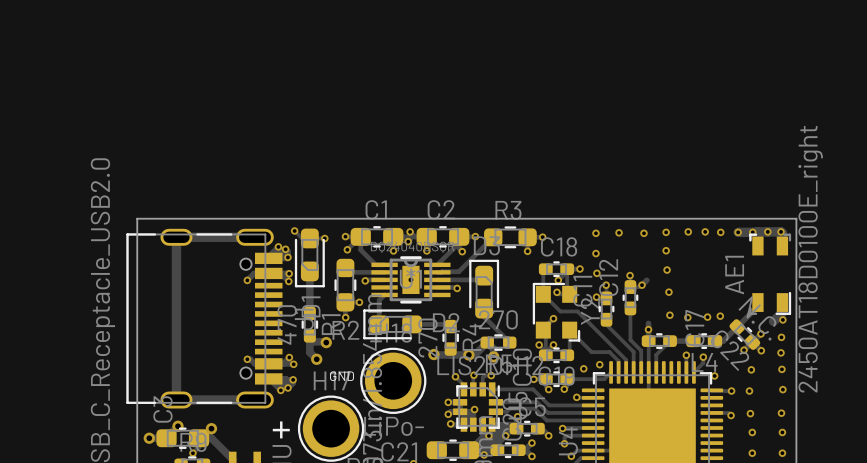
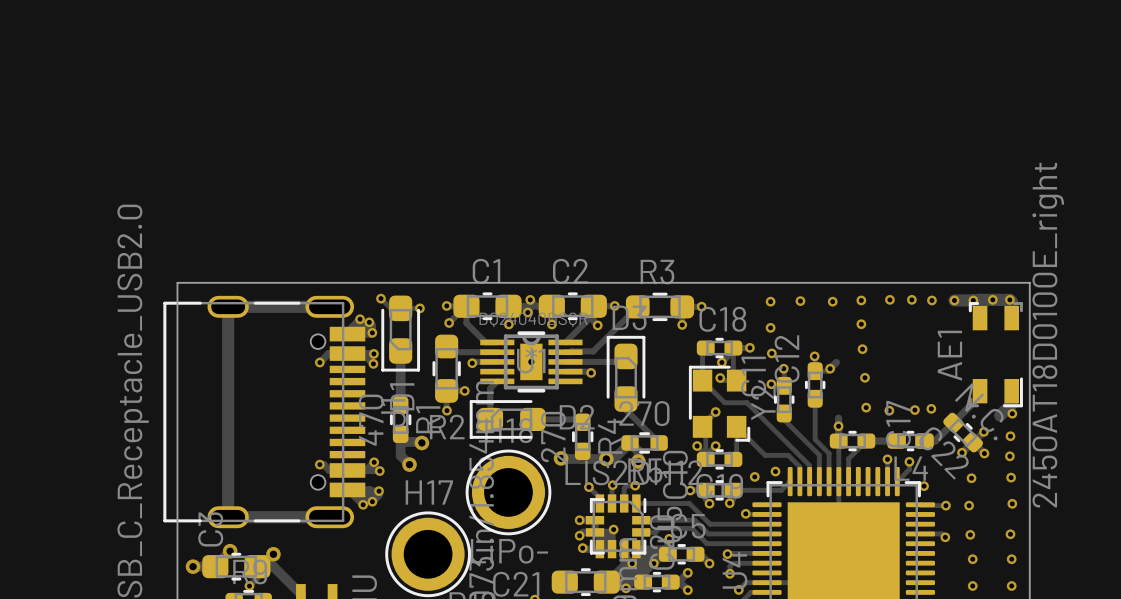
text: GND (341, 376) -> none
text: + (281, 429) -> none

